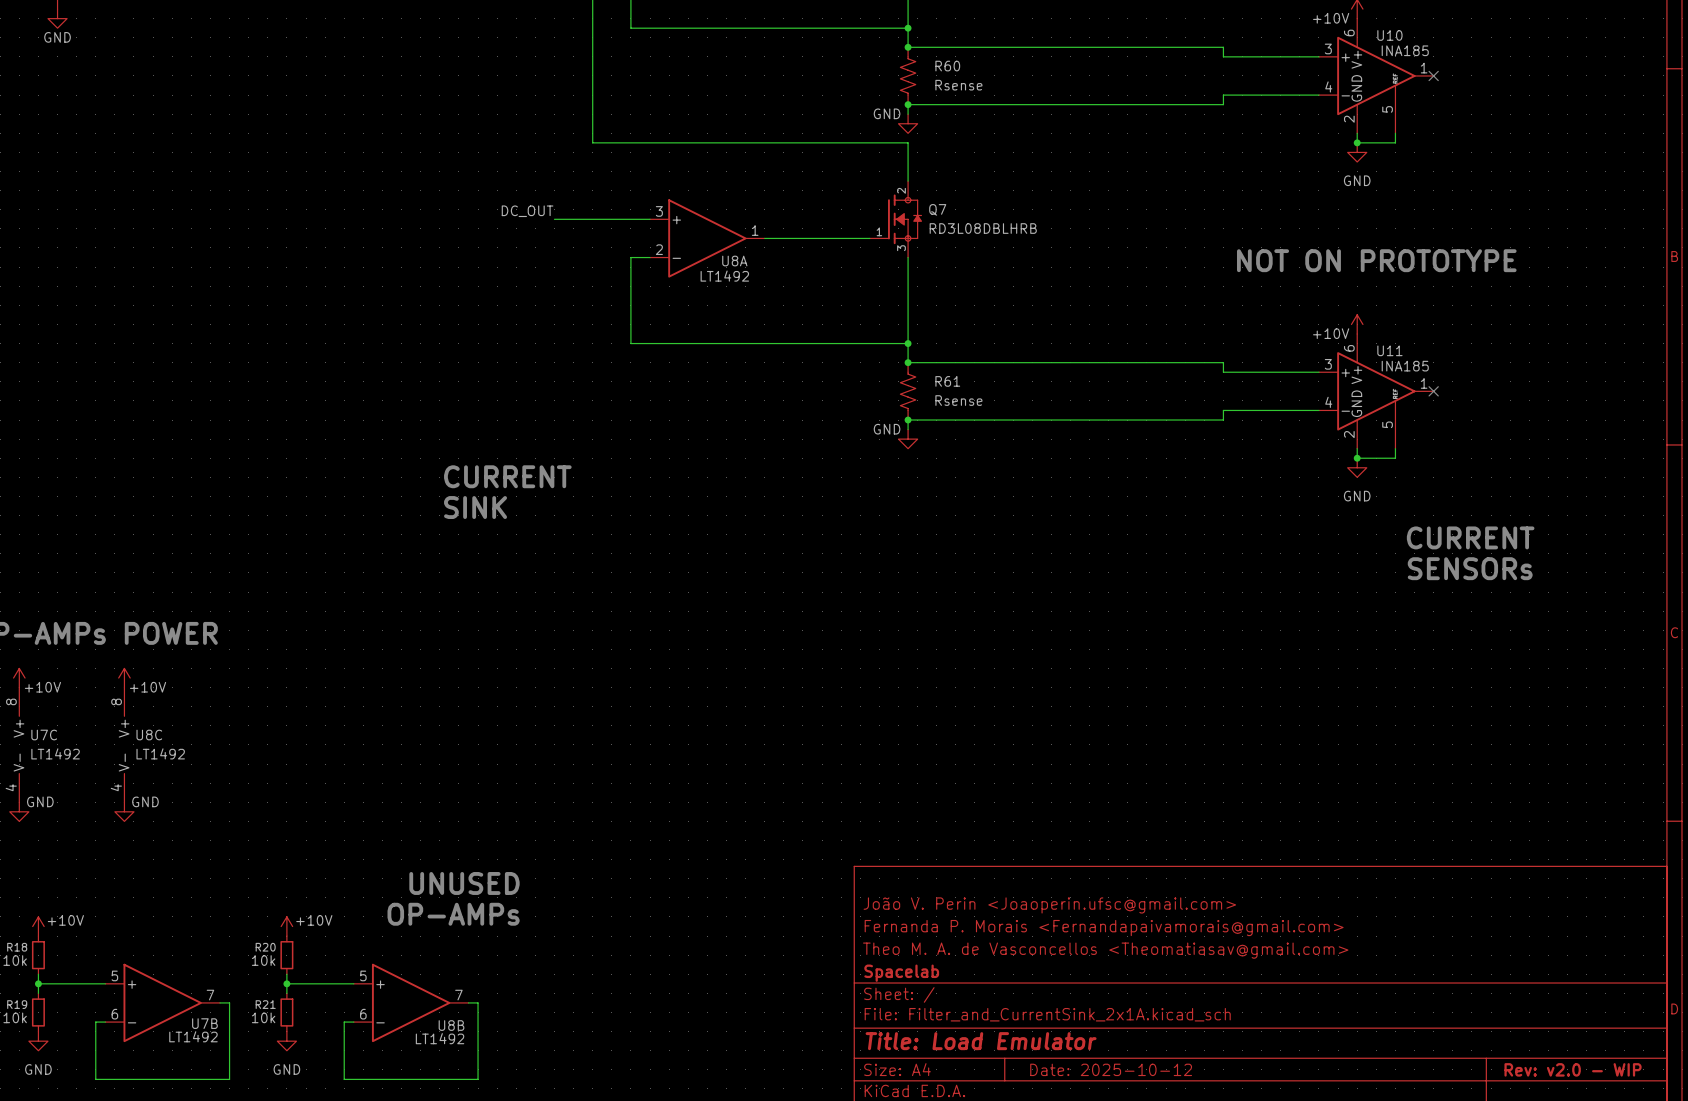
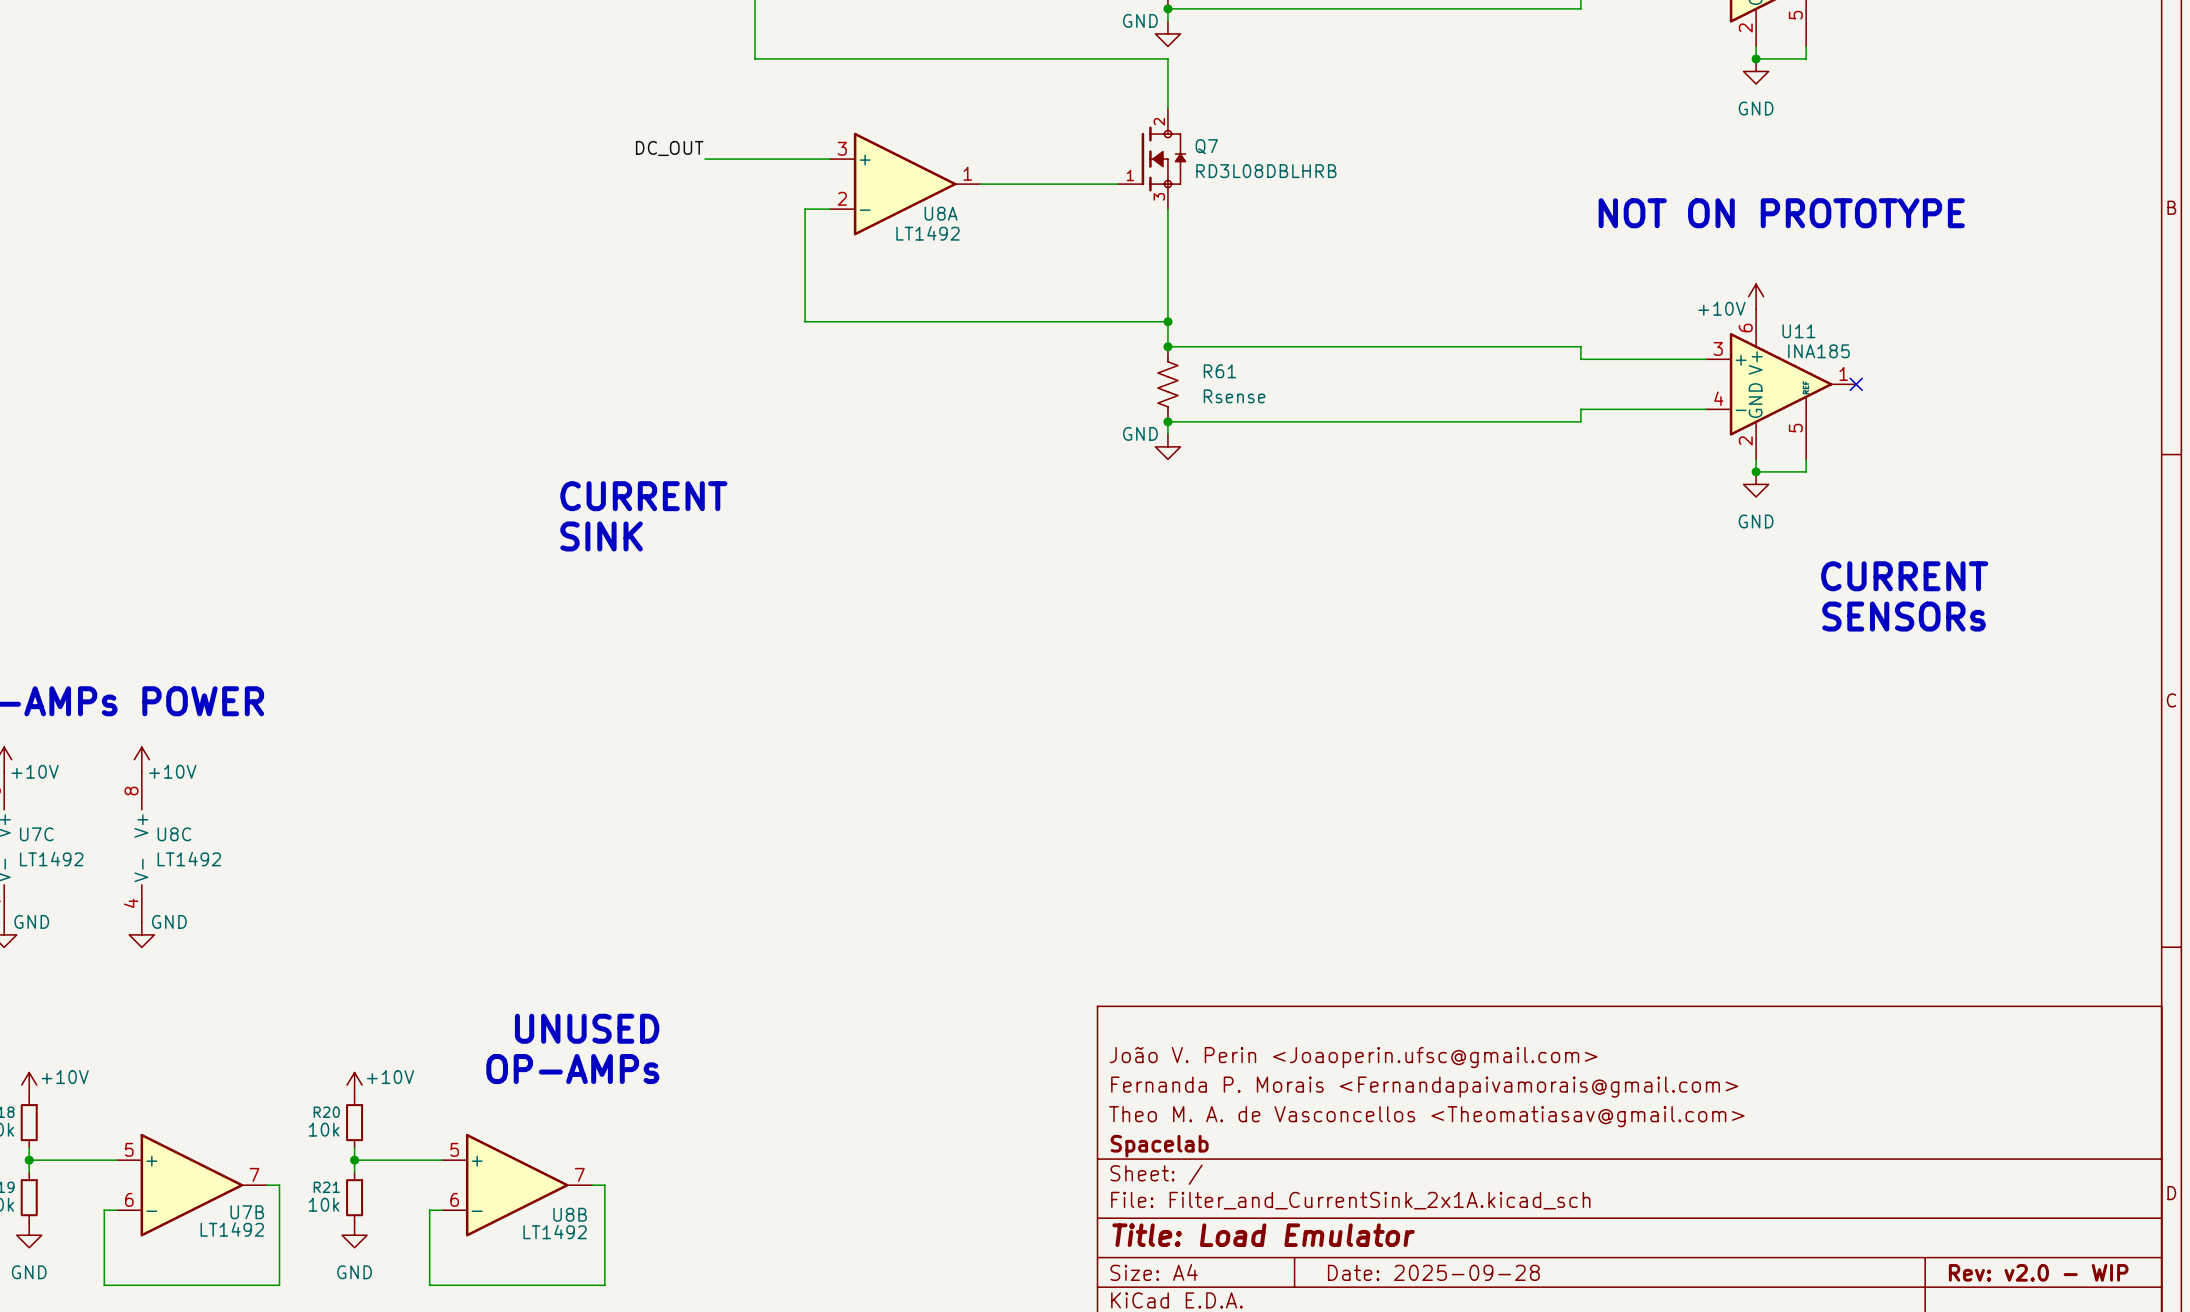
title block: Date: 2025-10-12 (1111, 1069) -> Date: 2025-09-28 (1433, 1272)

